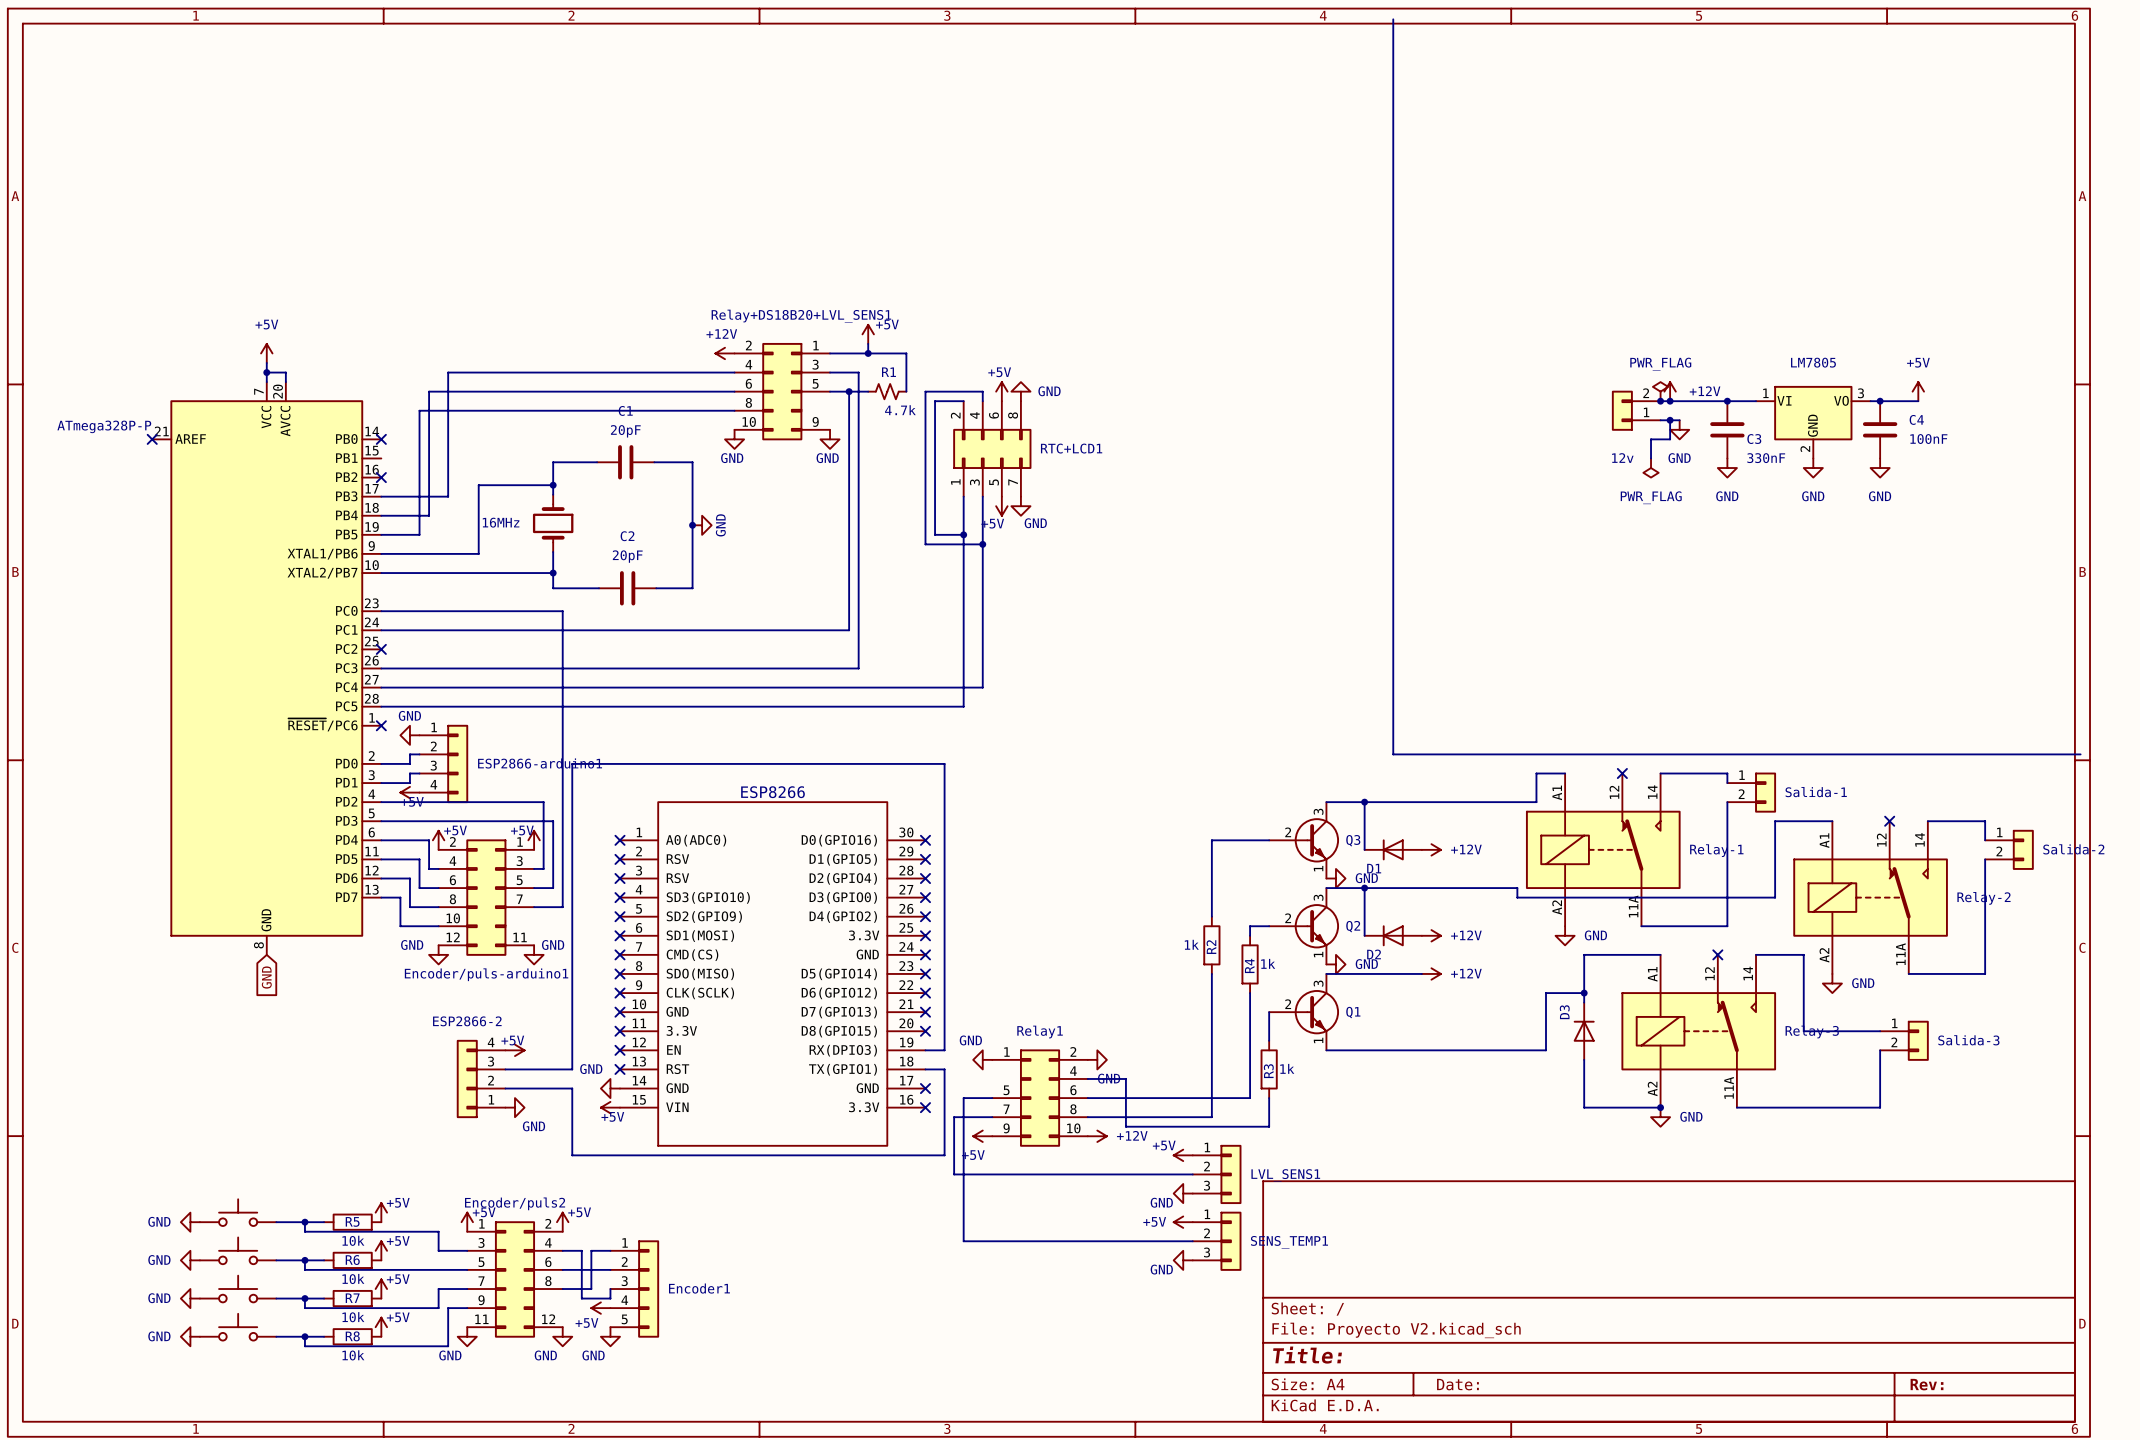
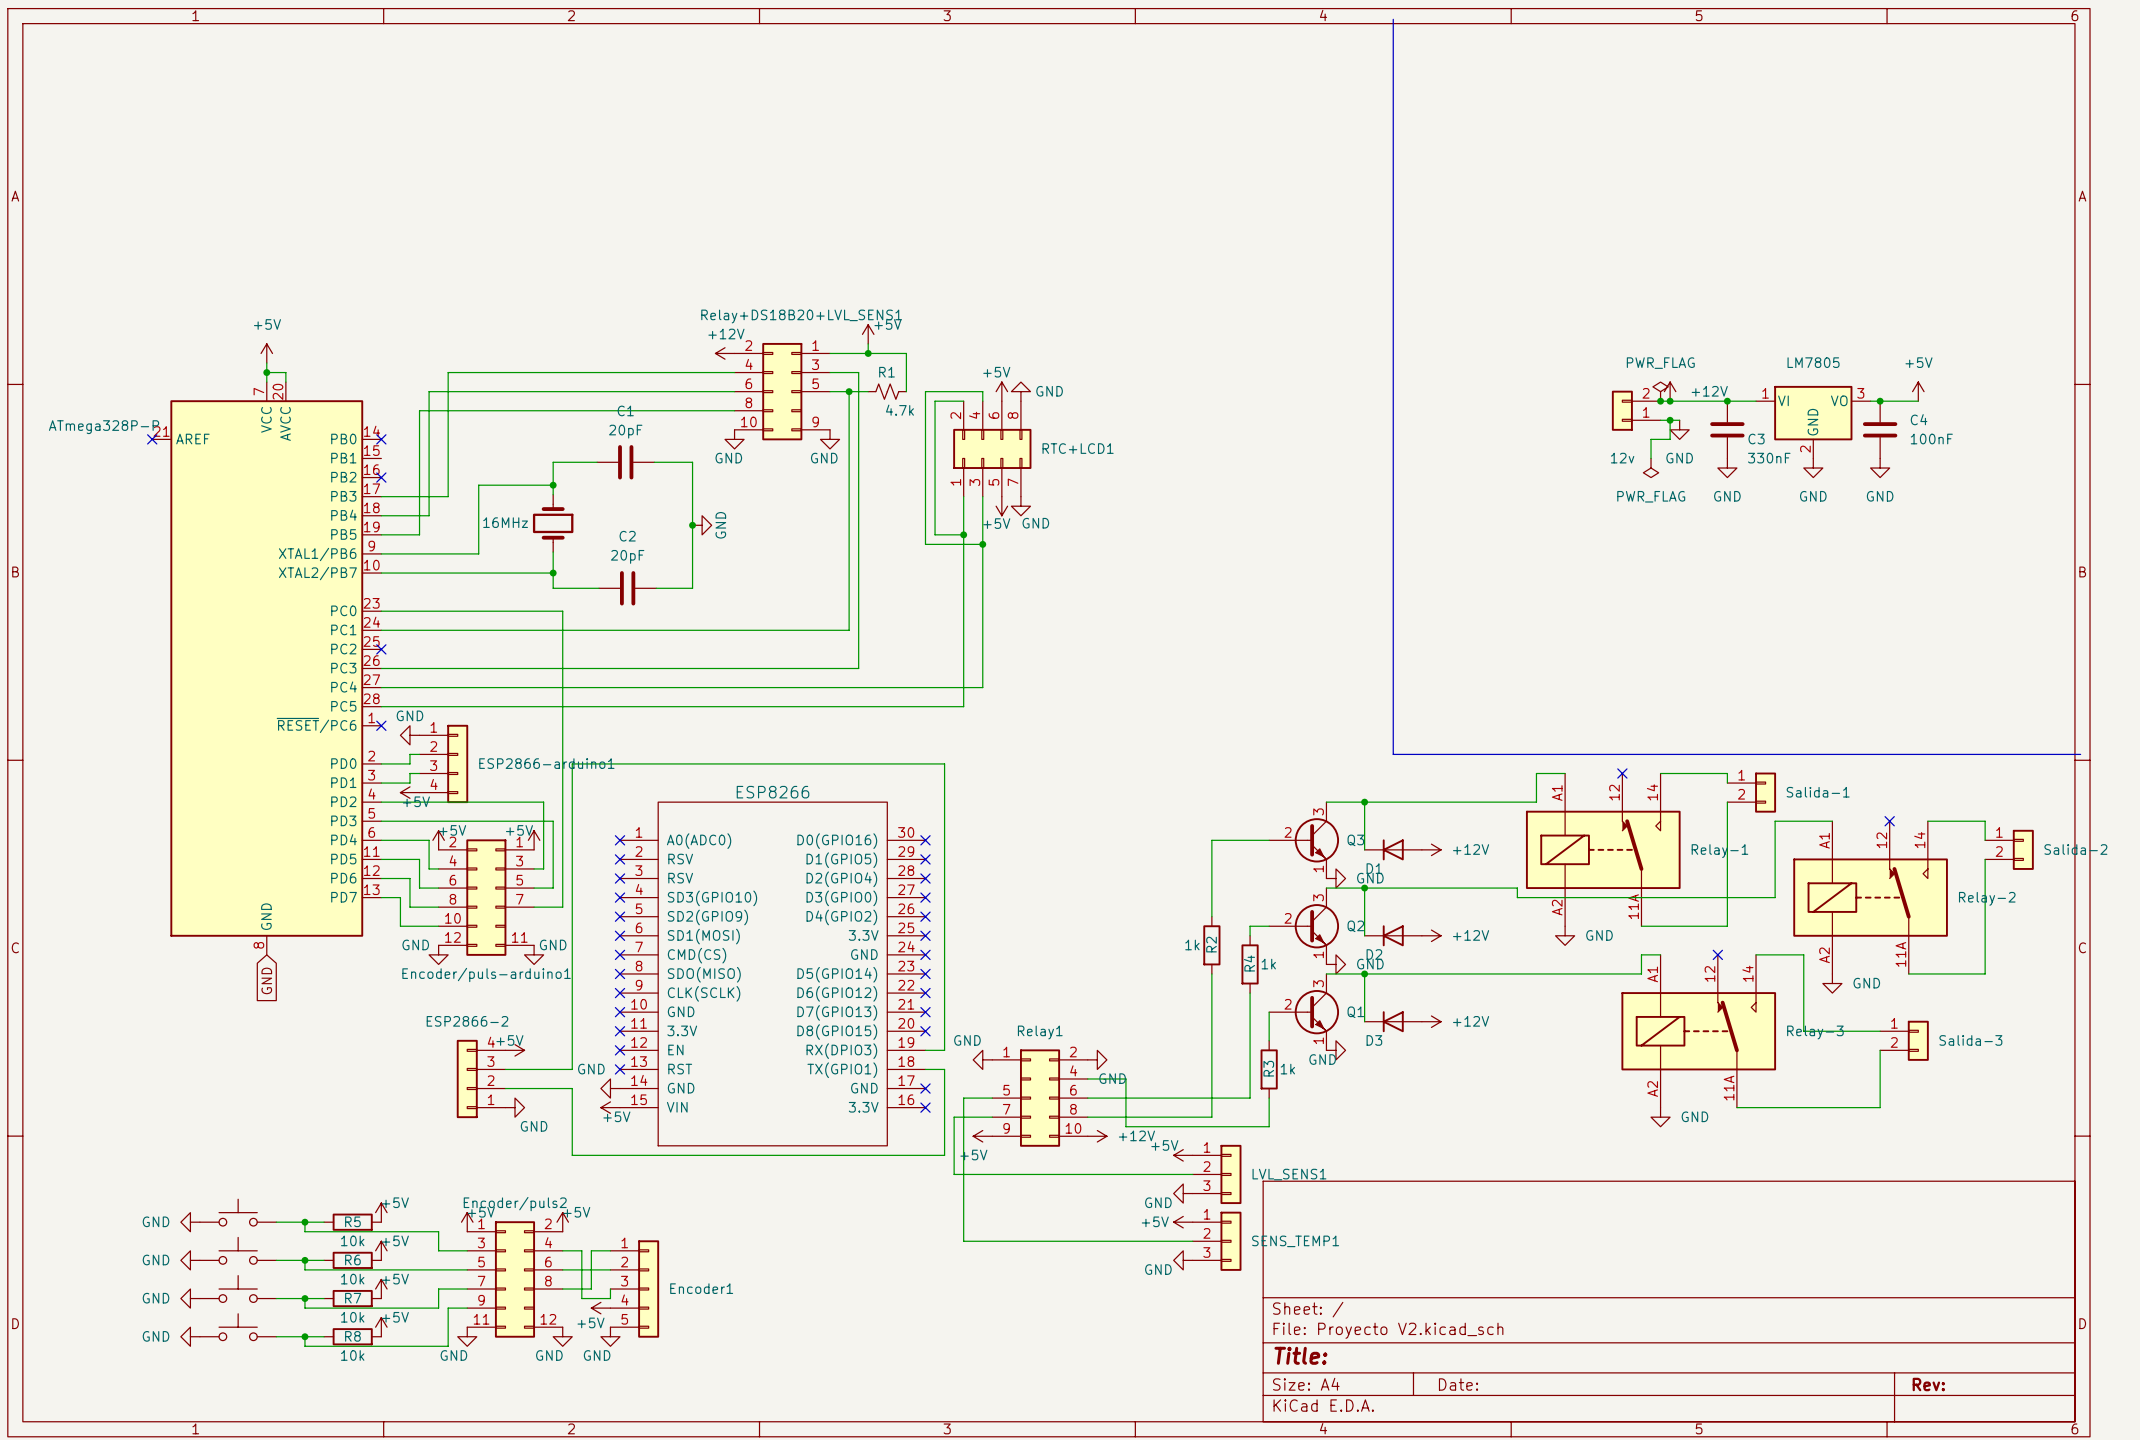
wire: (1641, 954) (1584, 954) (1584, 1002) -> (1641, 954) (1641, 973) (1421, 973)
wire: none -> (1364, 973) (1364, 1021)
junction: none -> (1364, 973)
power symbol position: +12V (1431, 973) -> +12V (1431, 1021)
wire: (1584, 993) (1546, 993) (1546, 1050) (1326, 1050) -> none
junction: (1584, 993) -> none
D3 rotation: 0° (1584, 1031) -> 90° counterclockwise (1393, 1021)
D3 position: (1584, 1031) -> (1393, 1021)
power symbol: none -> GND (1335, 1050)
wire: (1584, 1059) (1584, 1107) (1660, 1107) -> none
junction: (1660, 1107) -> none

